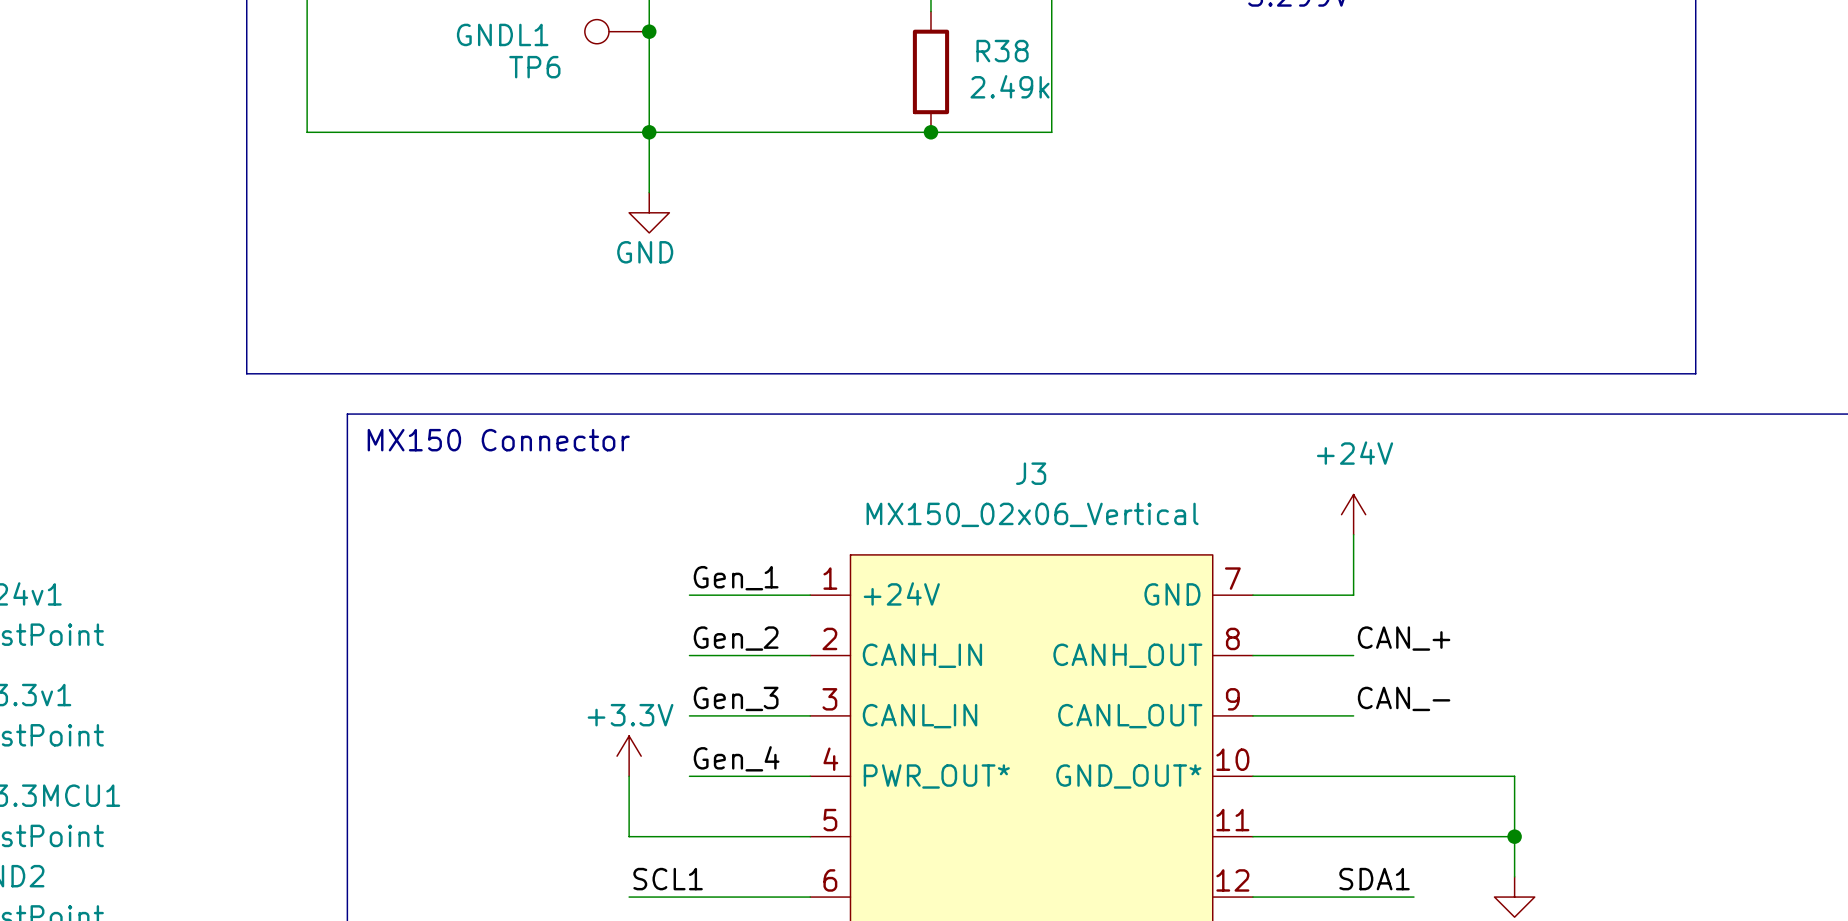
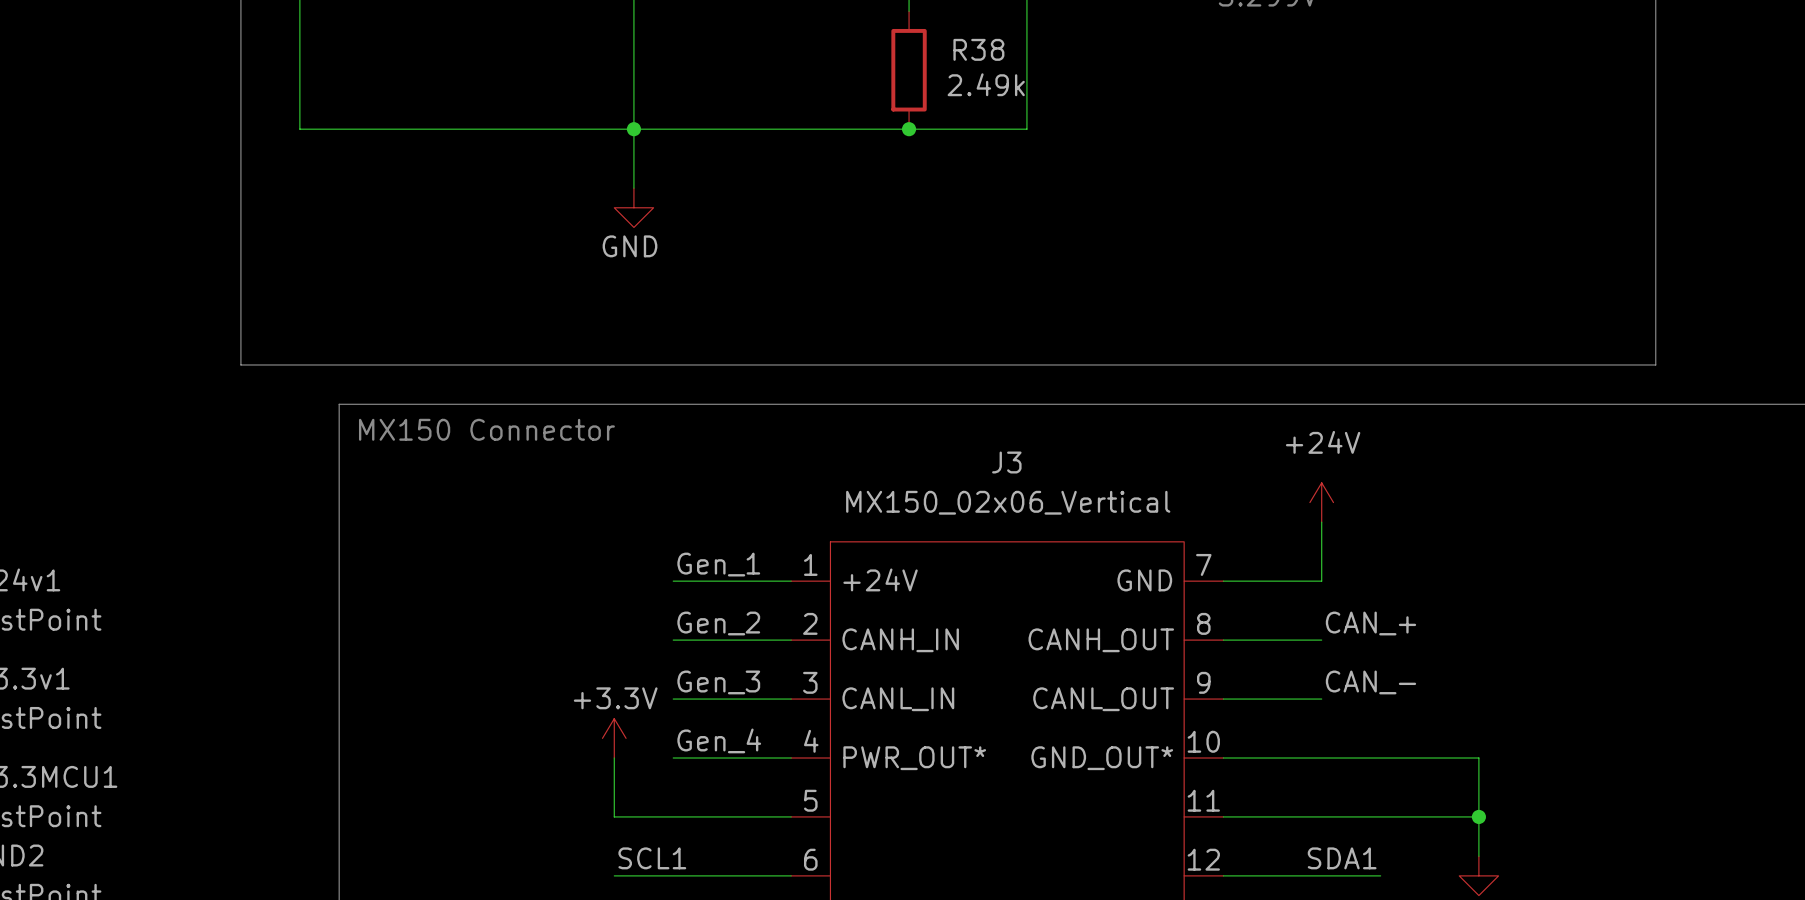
GNDL1: TP6 (617, 31) -> none
junction: (649, 31) -> none

